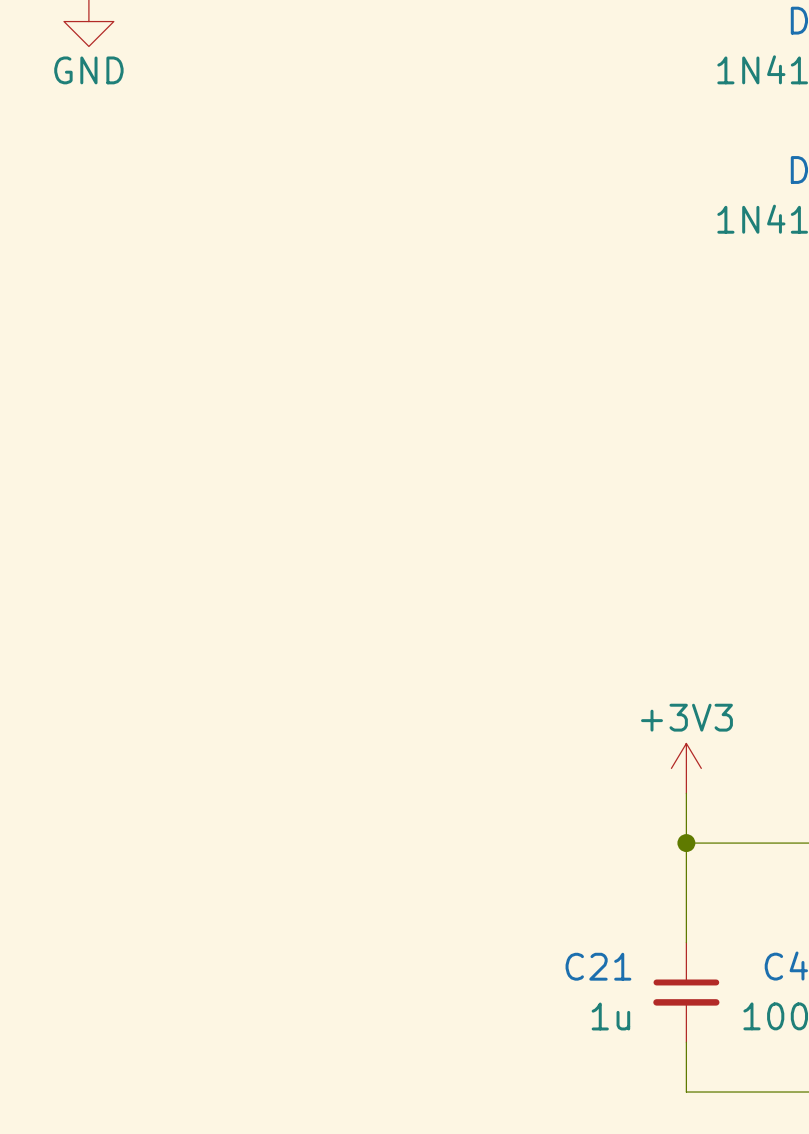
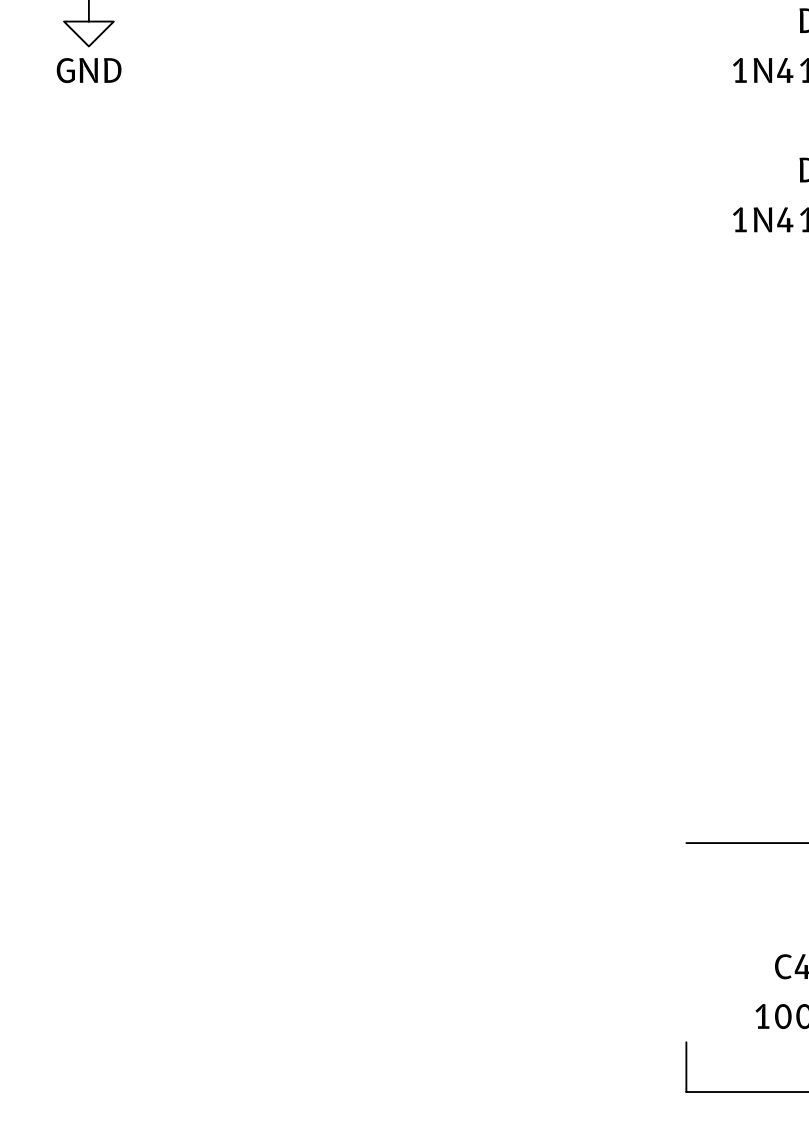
power symbol: +3V3 (686, 768) -> none
wire: (686, 793) (686, 942) -> none
junction: (686, 843) -> none
C21: 1u (686, 992) -> none

